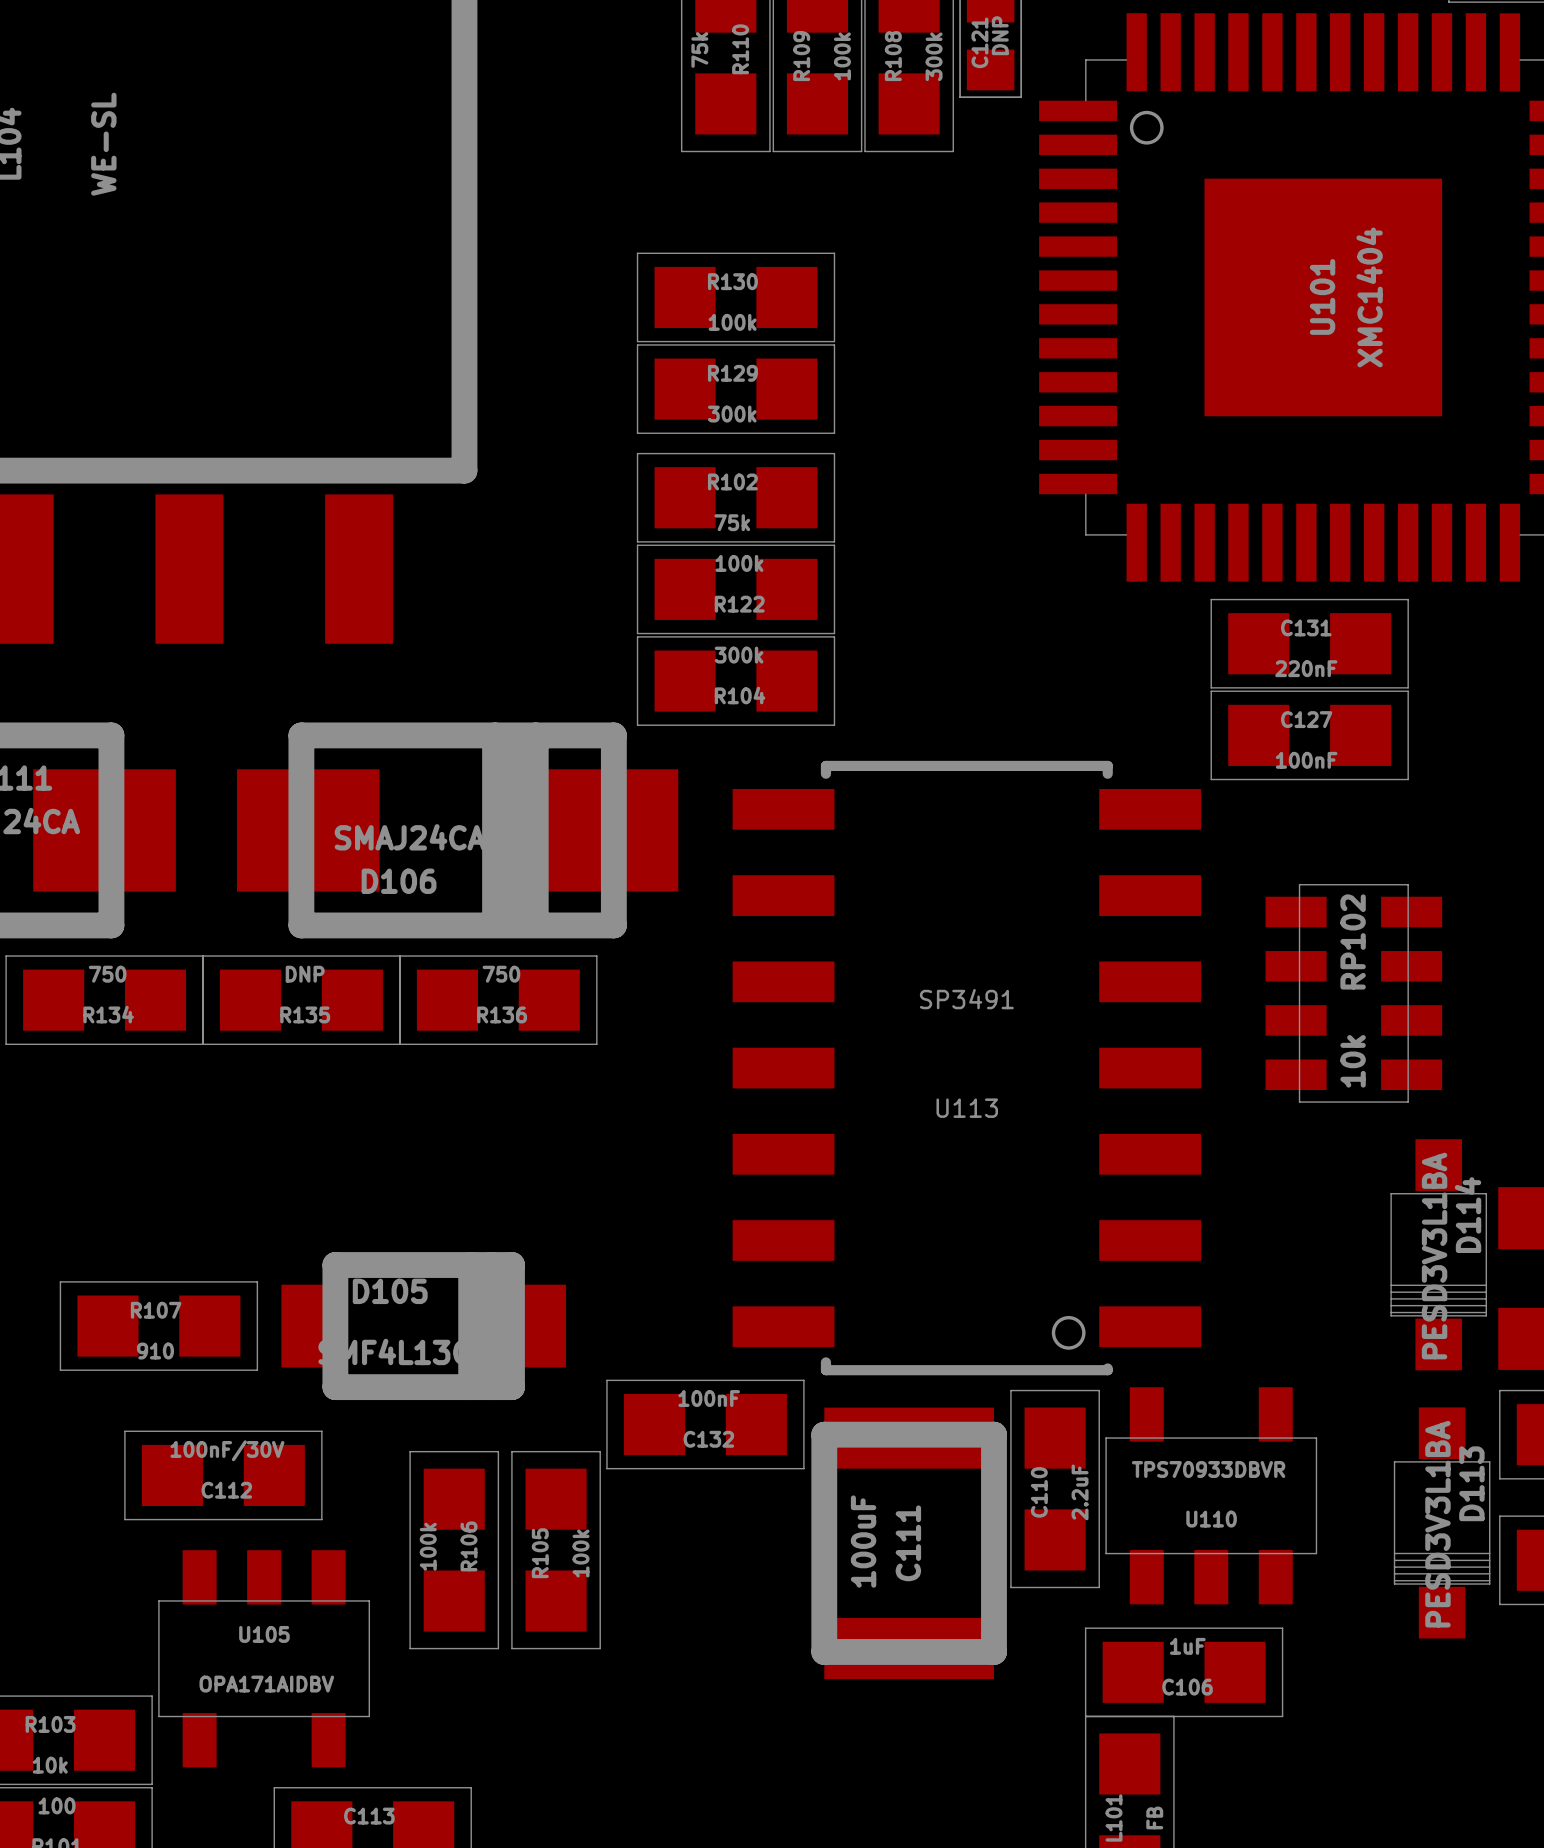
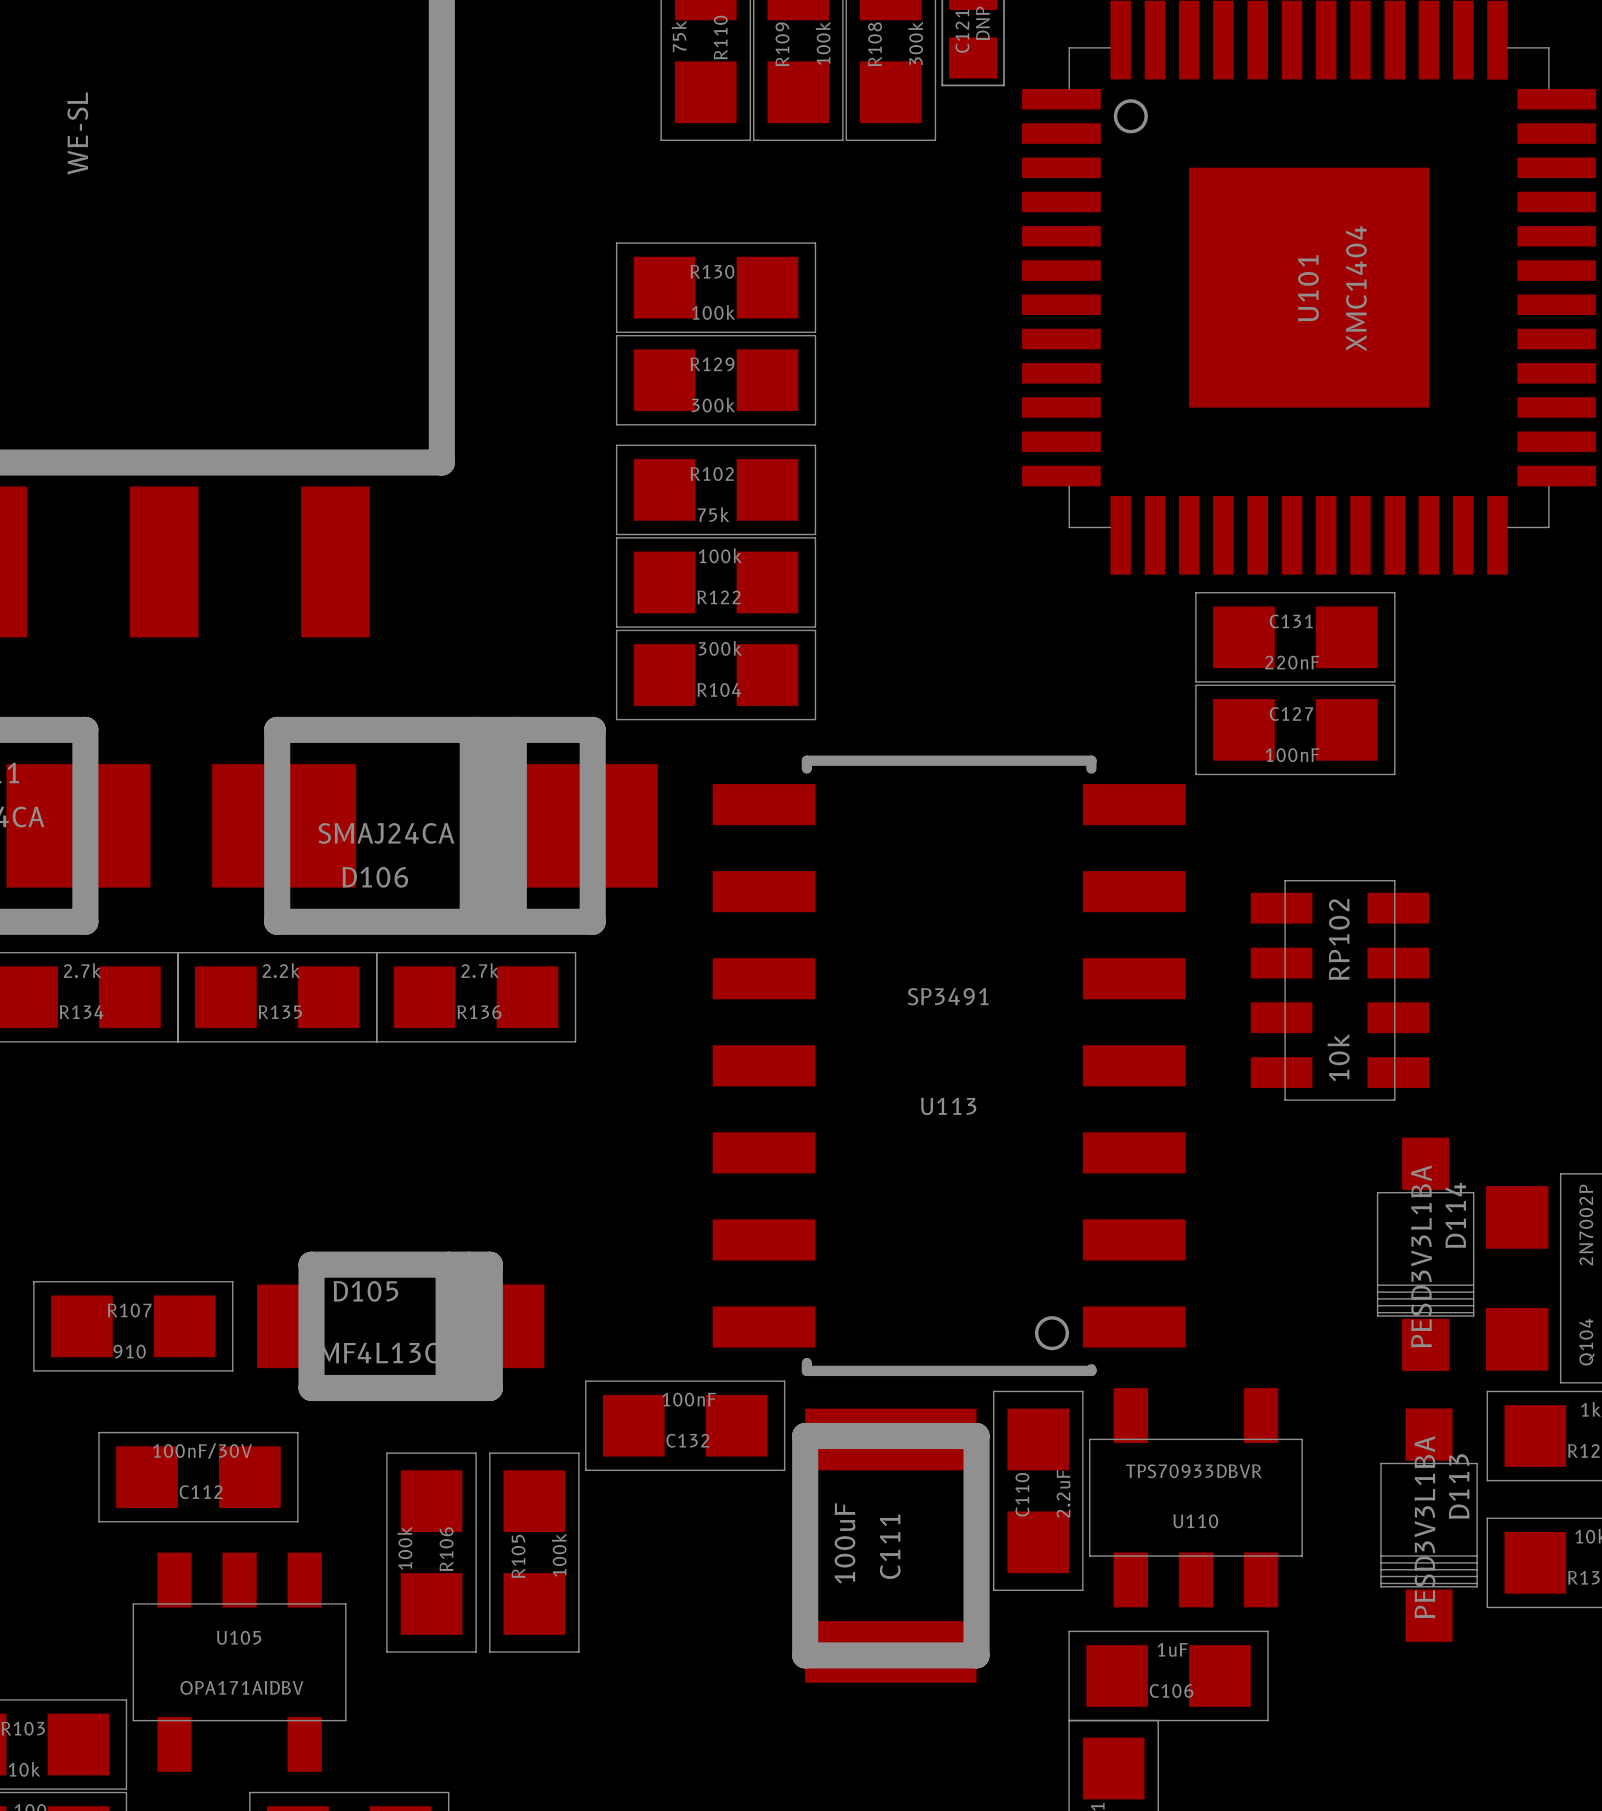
R134 value: 750 (107, 974) -> 2.7k (82, 970)
R135 value: DNP (305, 974) -> 2.2k (281, 970)
R136 value: 750 (501, 974) -> 2.7k (480, 970)

